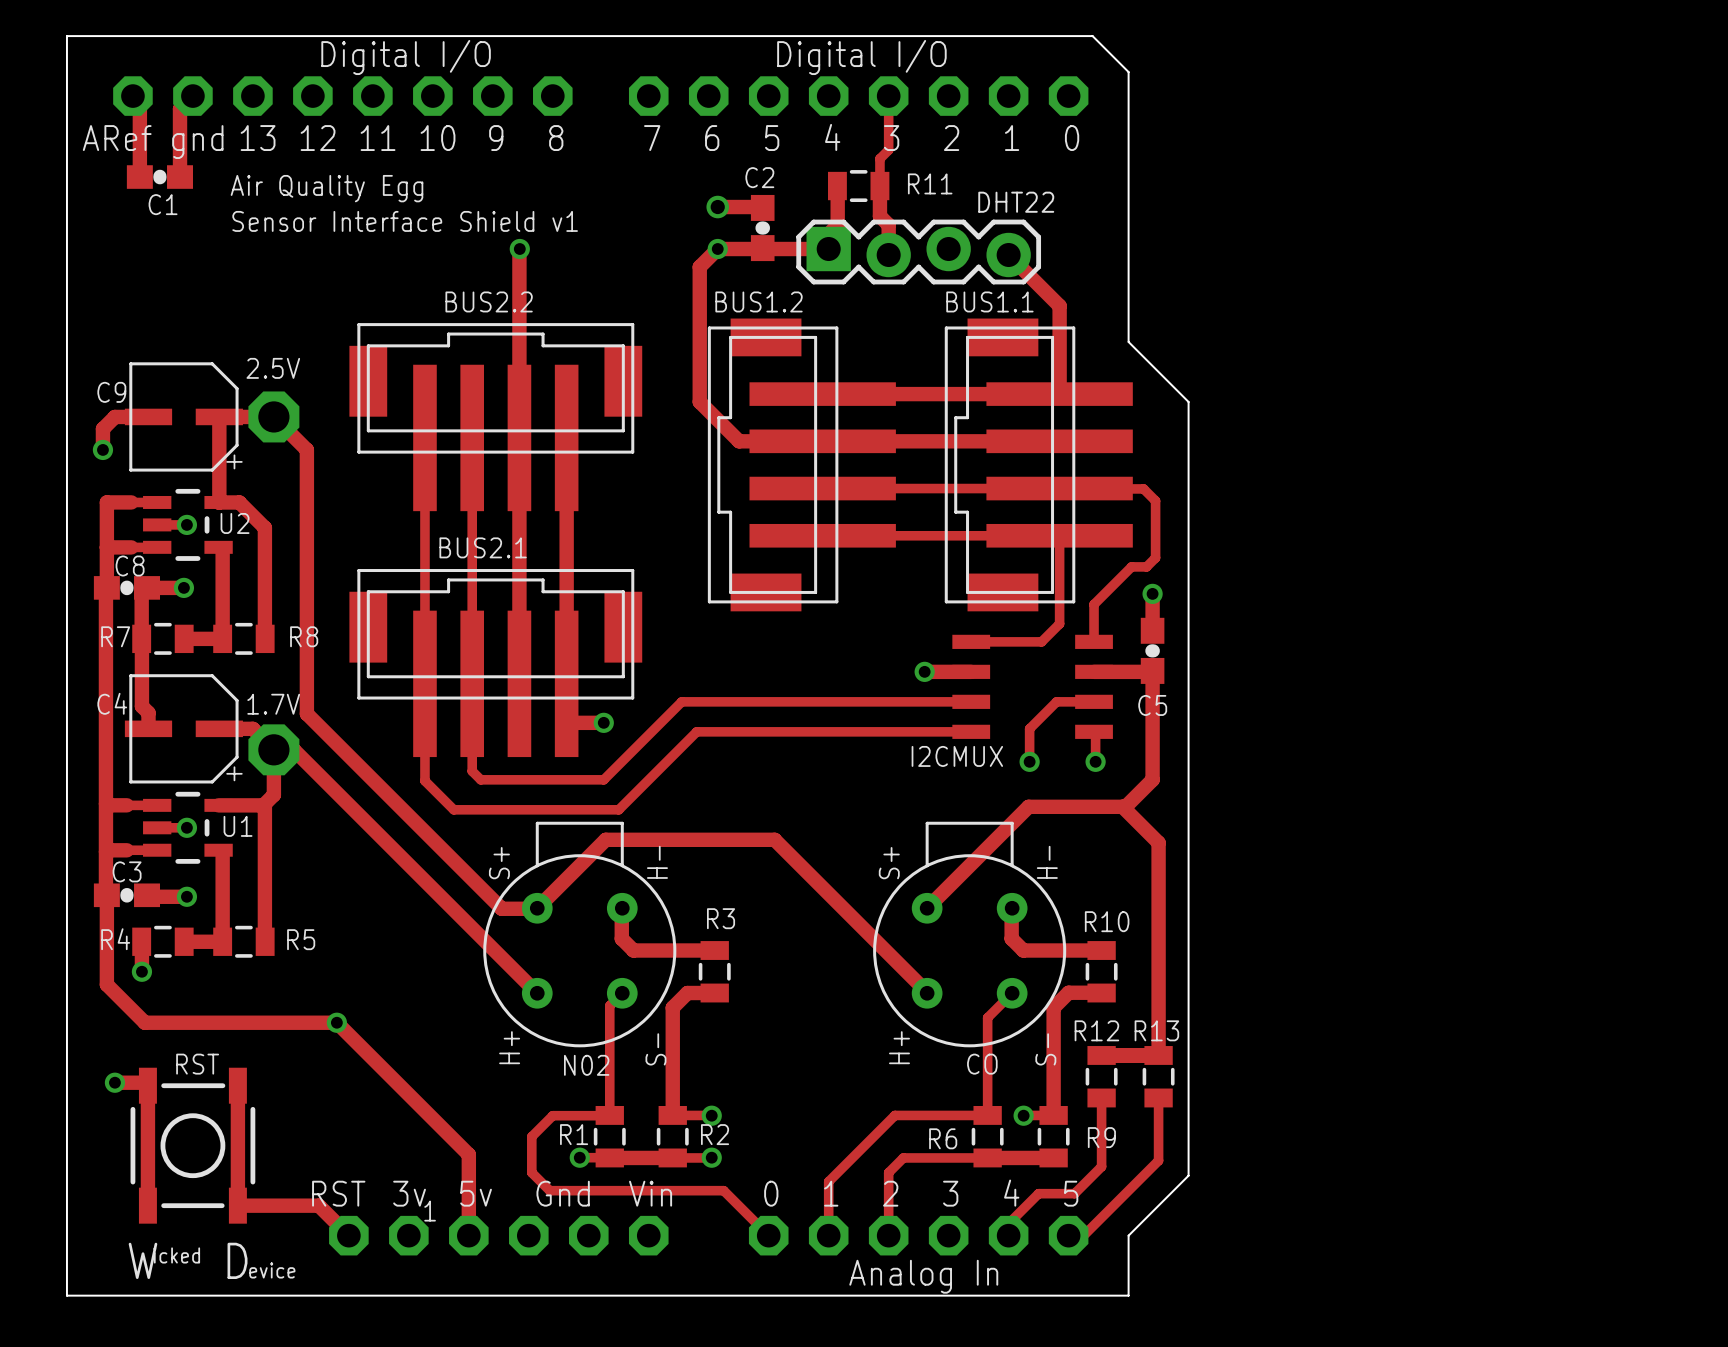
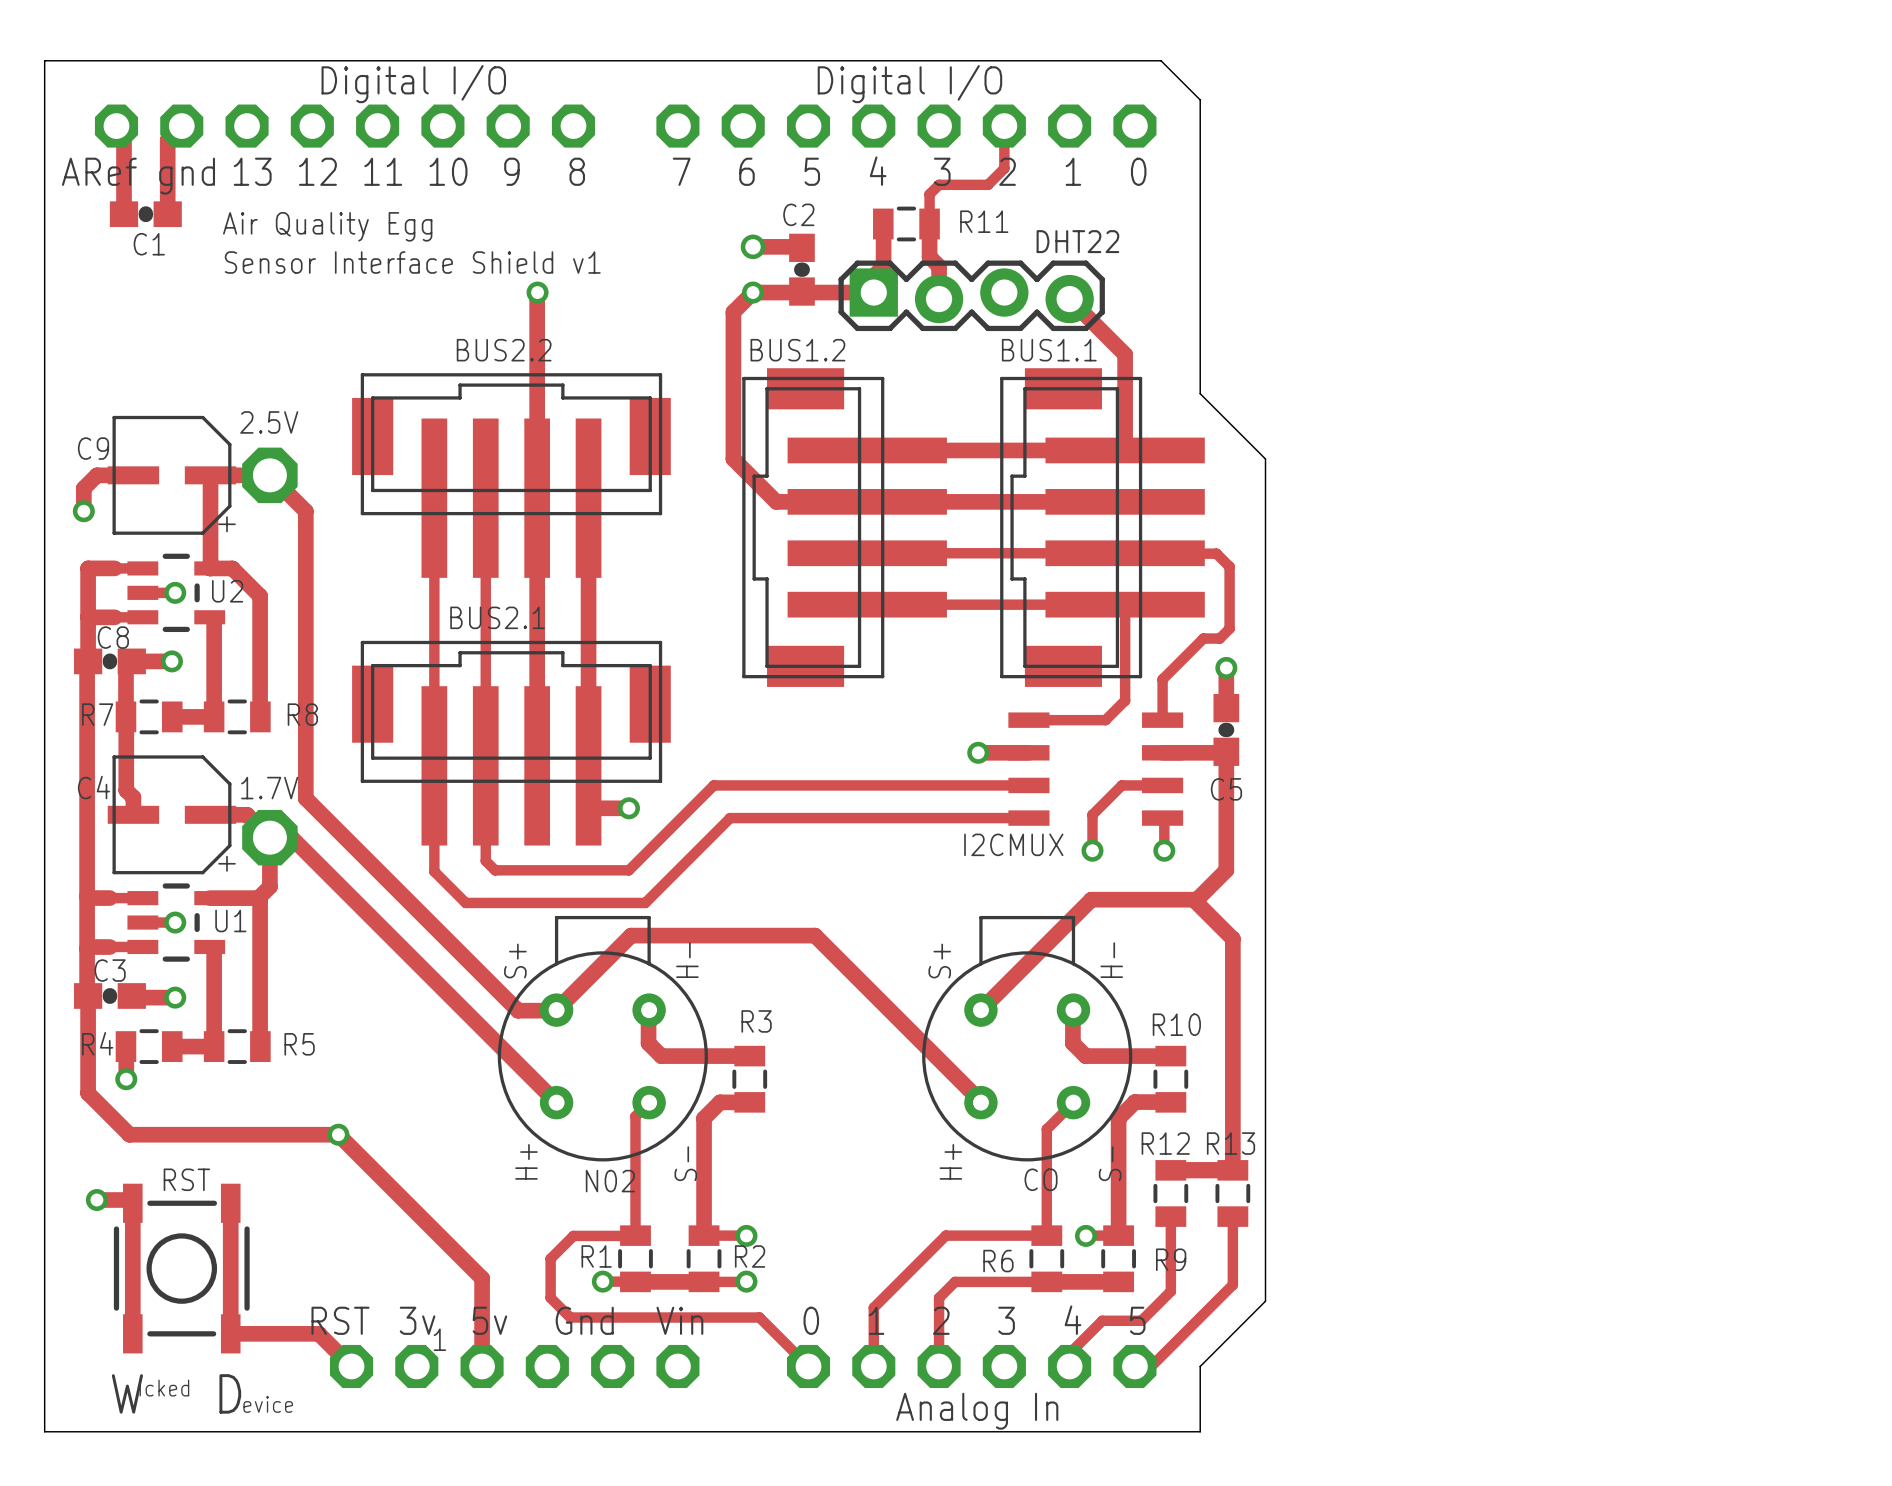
track: (888, 96) (888, 150) -> (1004, 126) (1004, 168) (988, 184) (939, 184)

